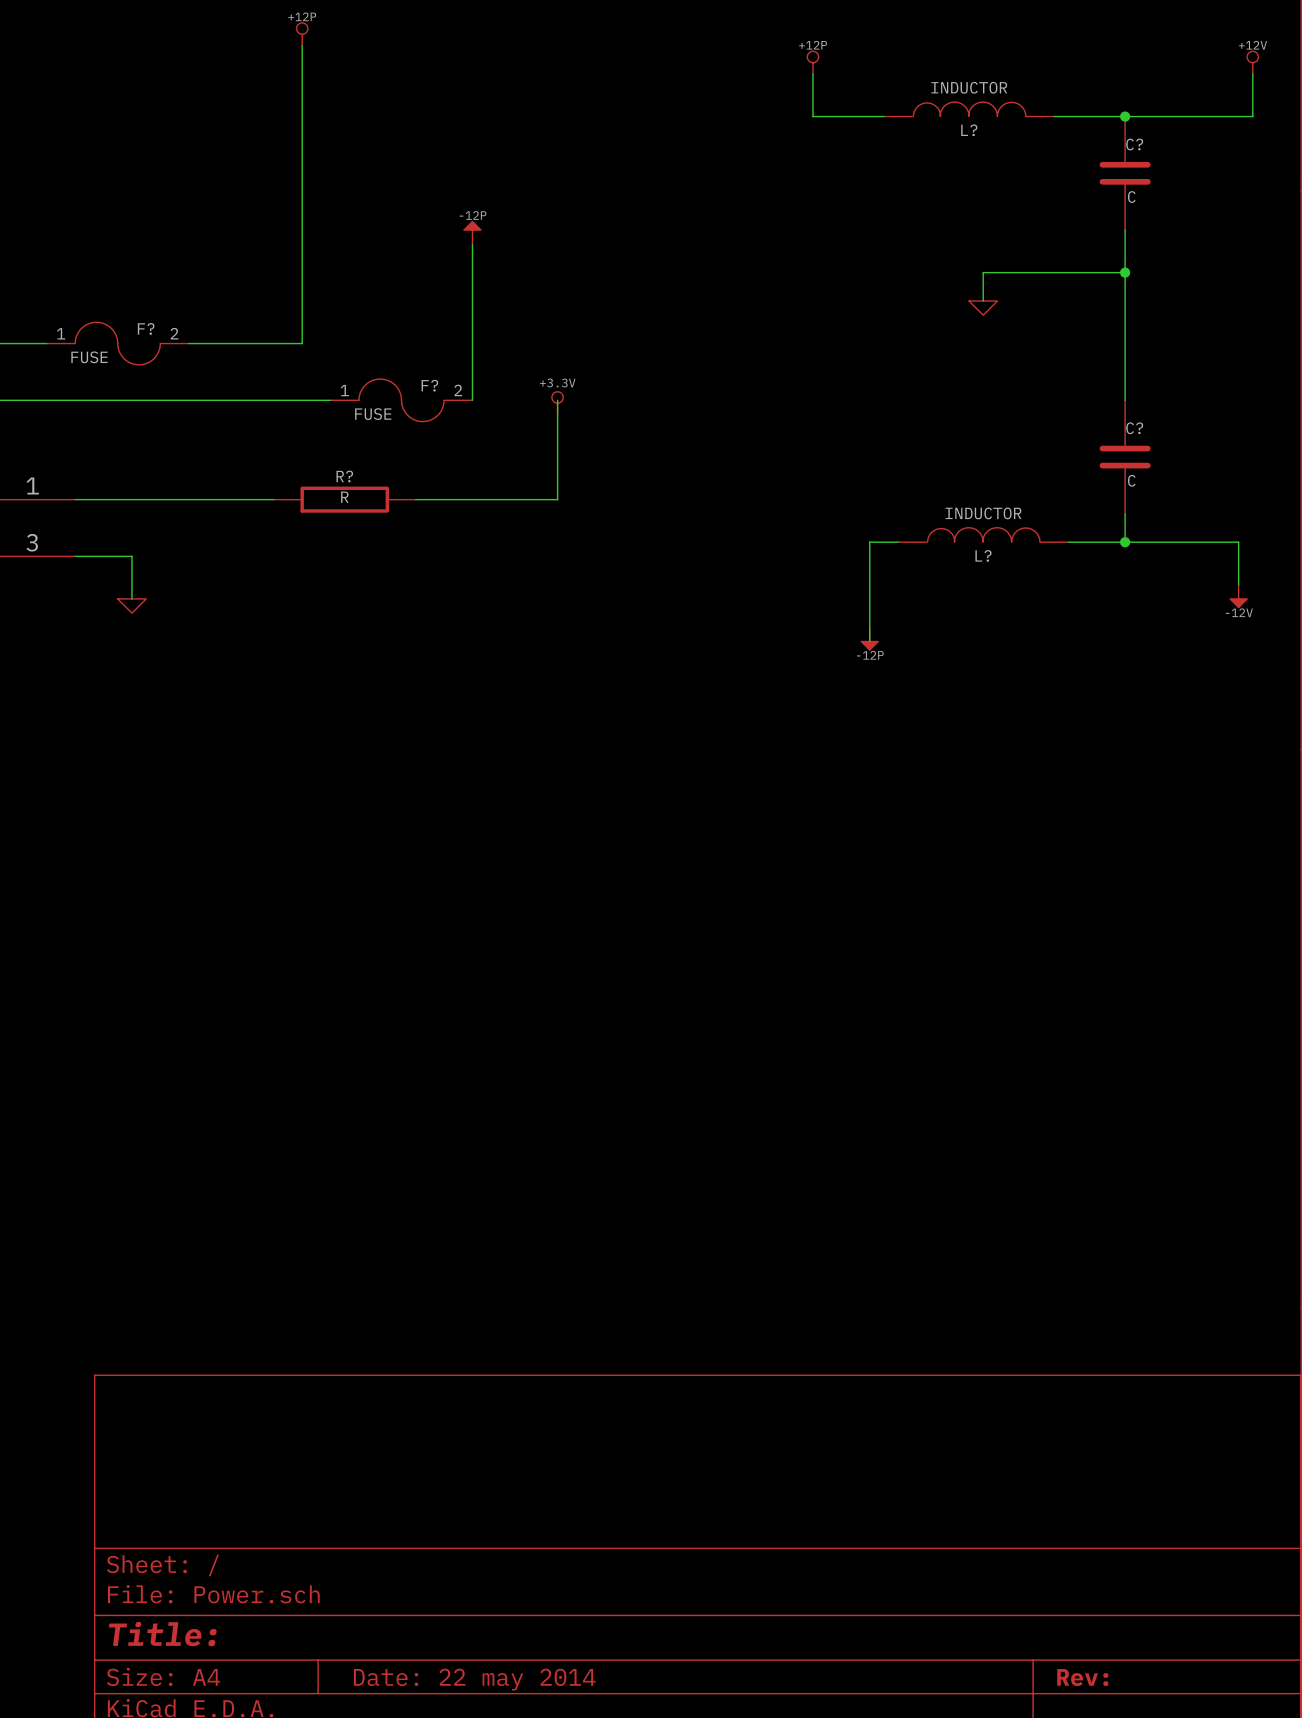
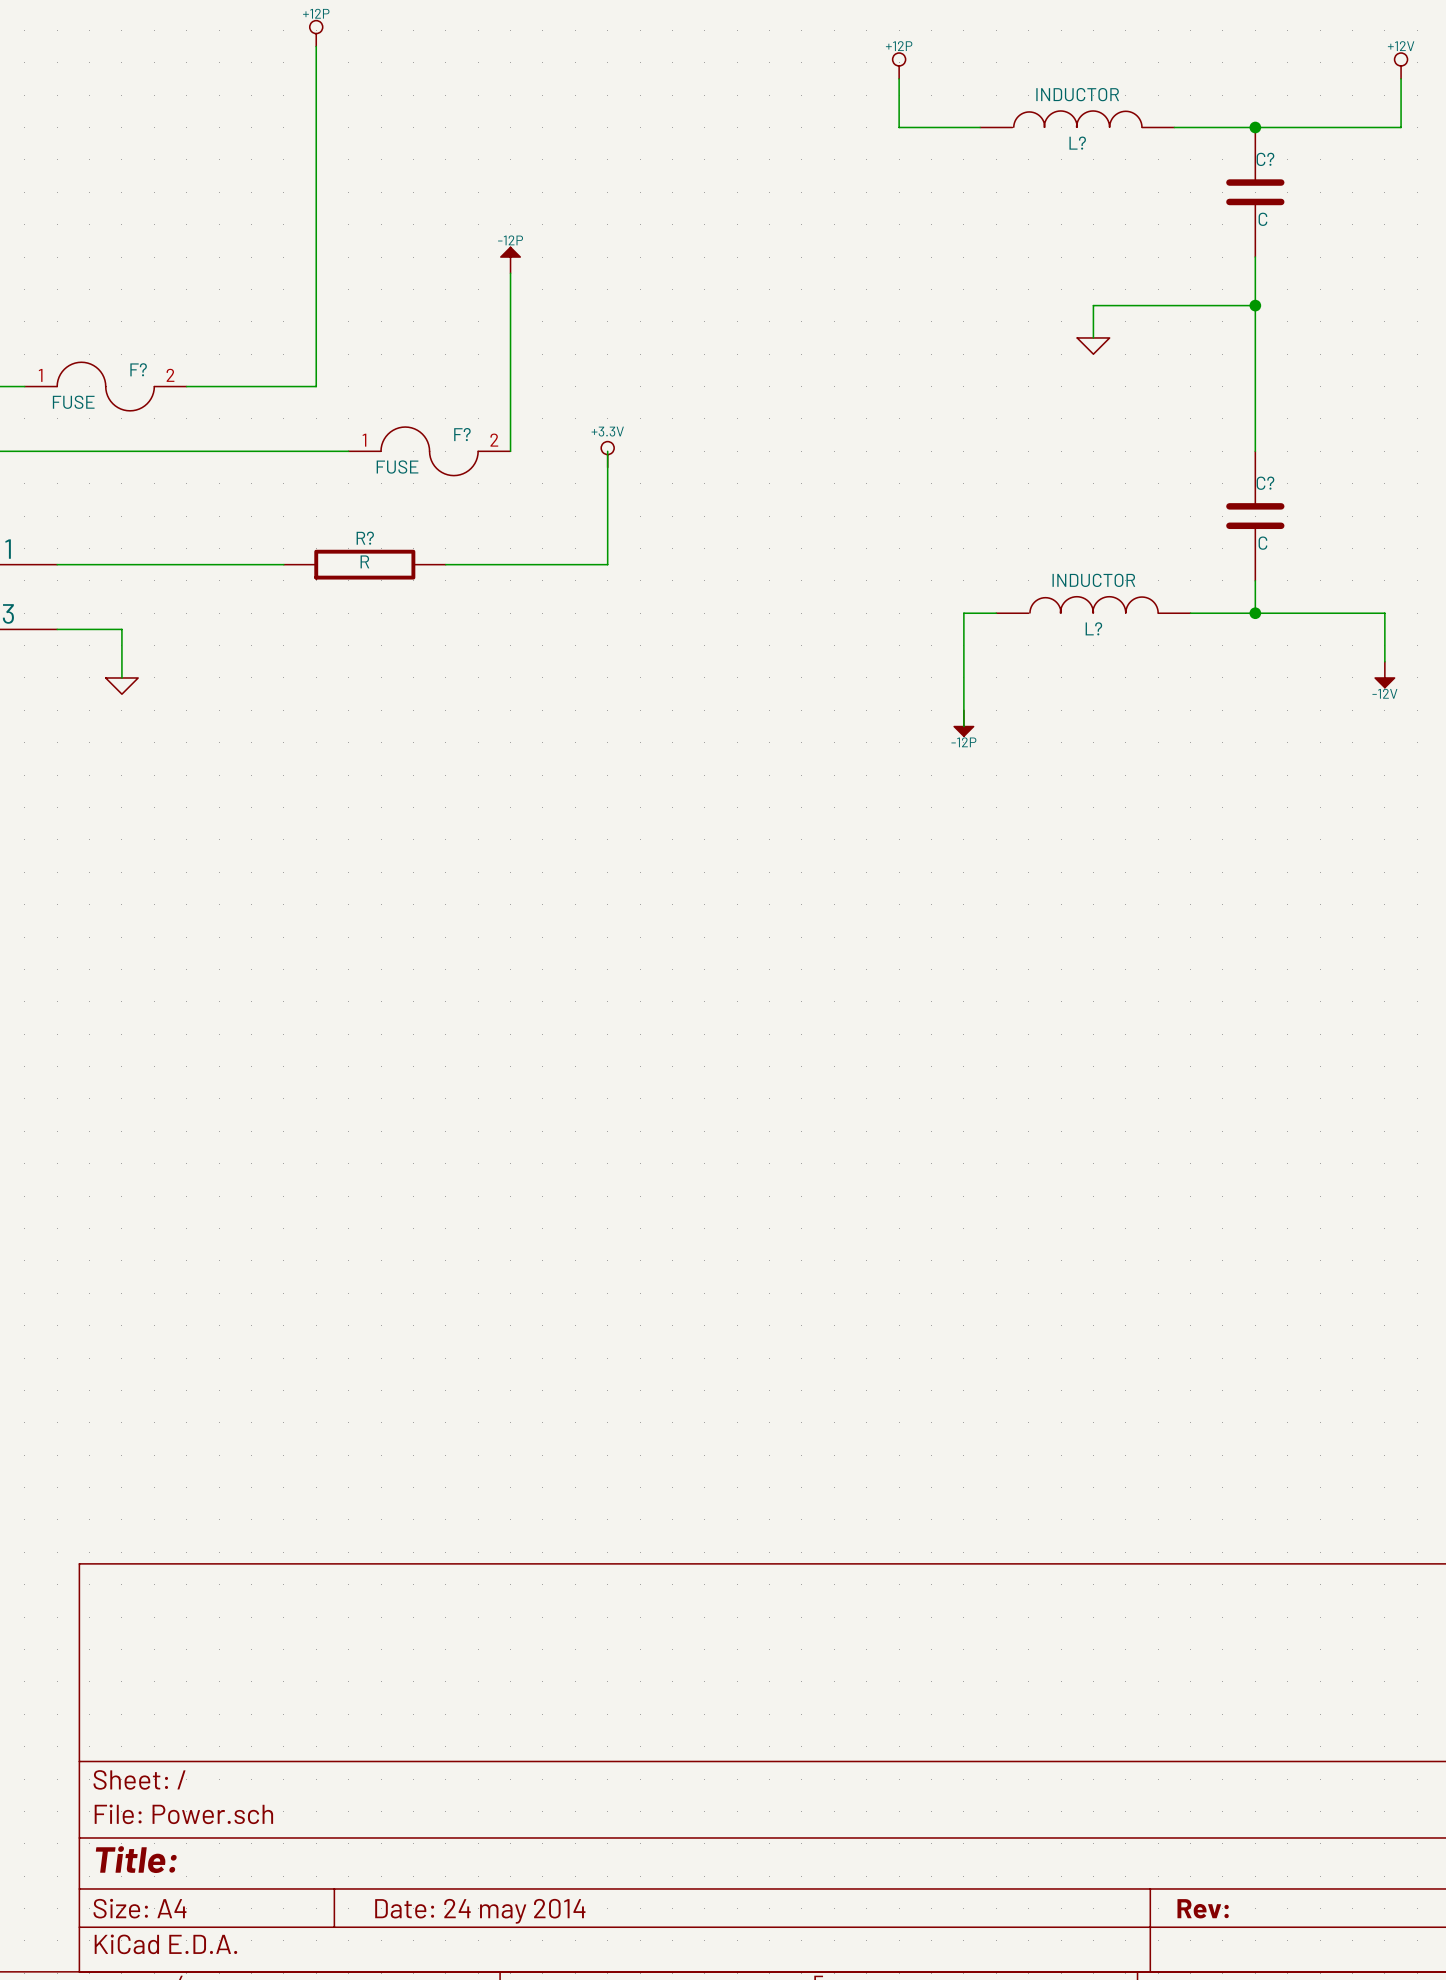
title block: Date: 22 may 2014 (474, 1679) -> Date: 24 may 2014 (480, 1911)

